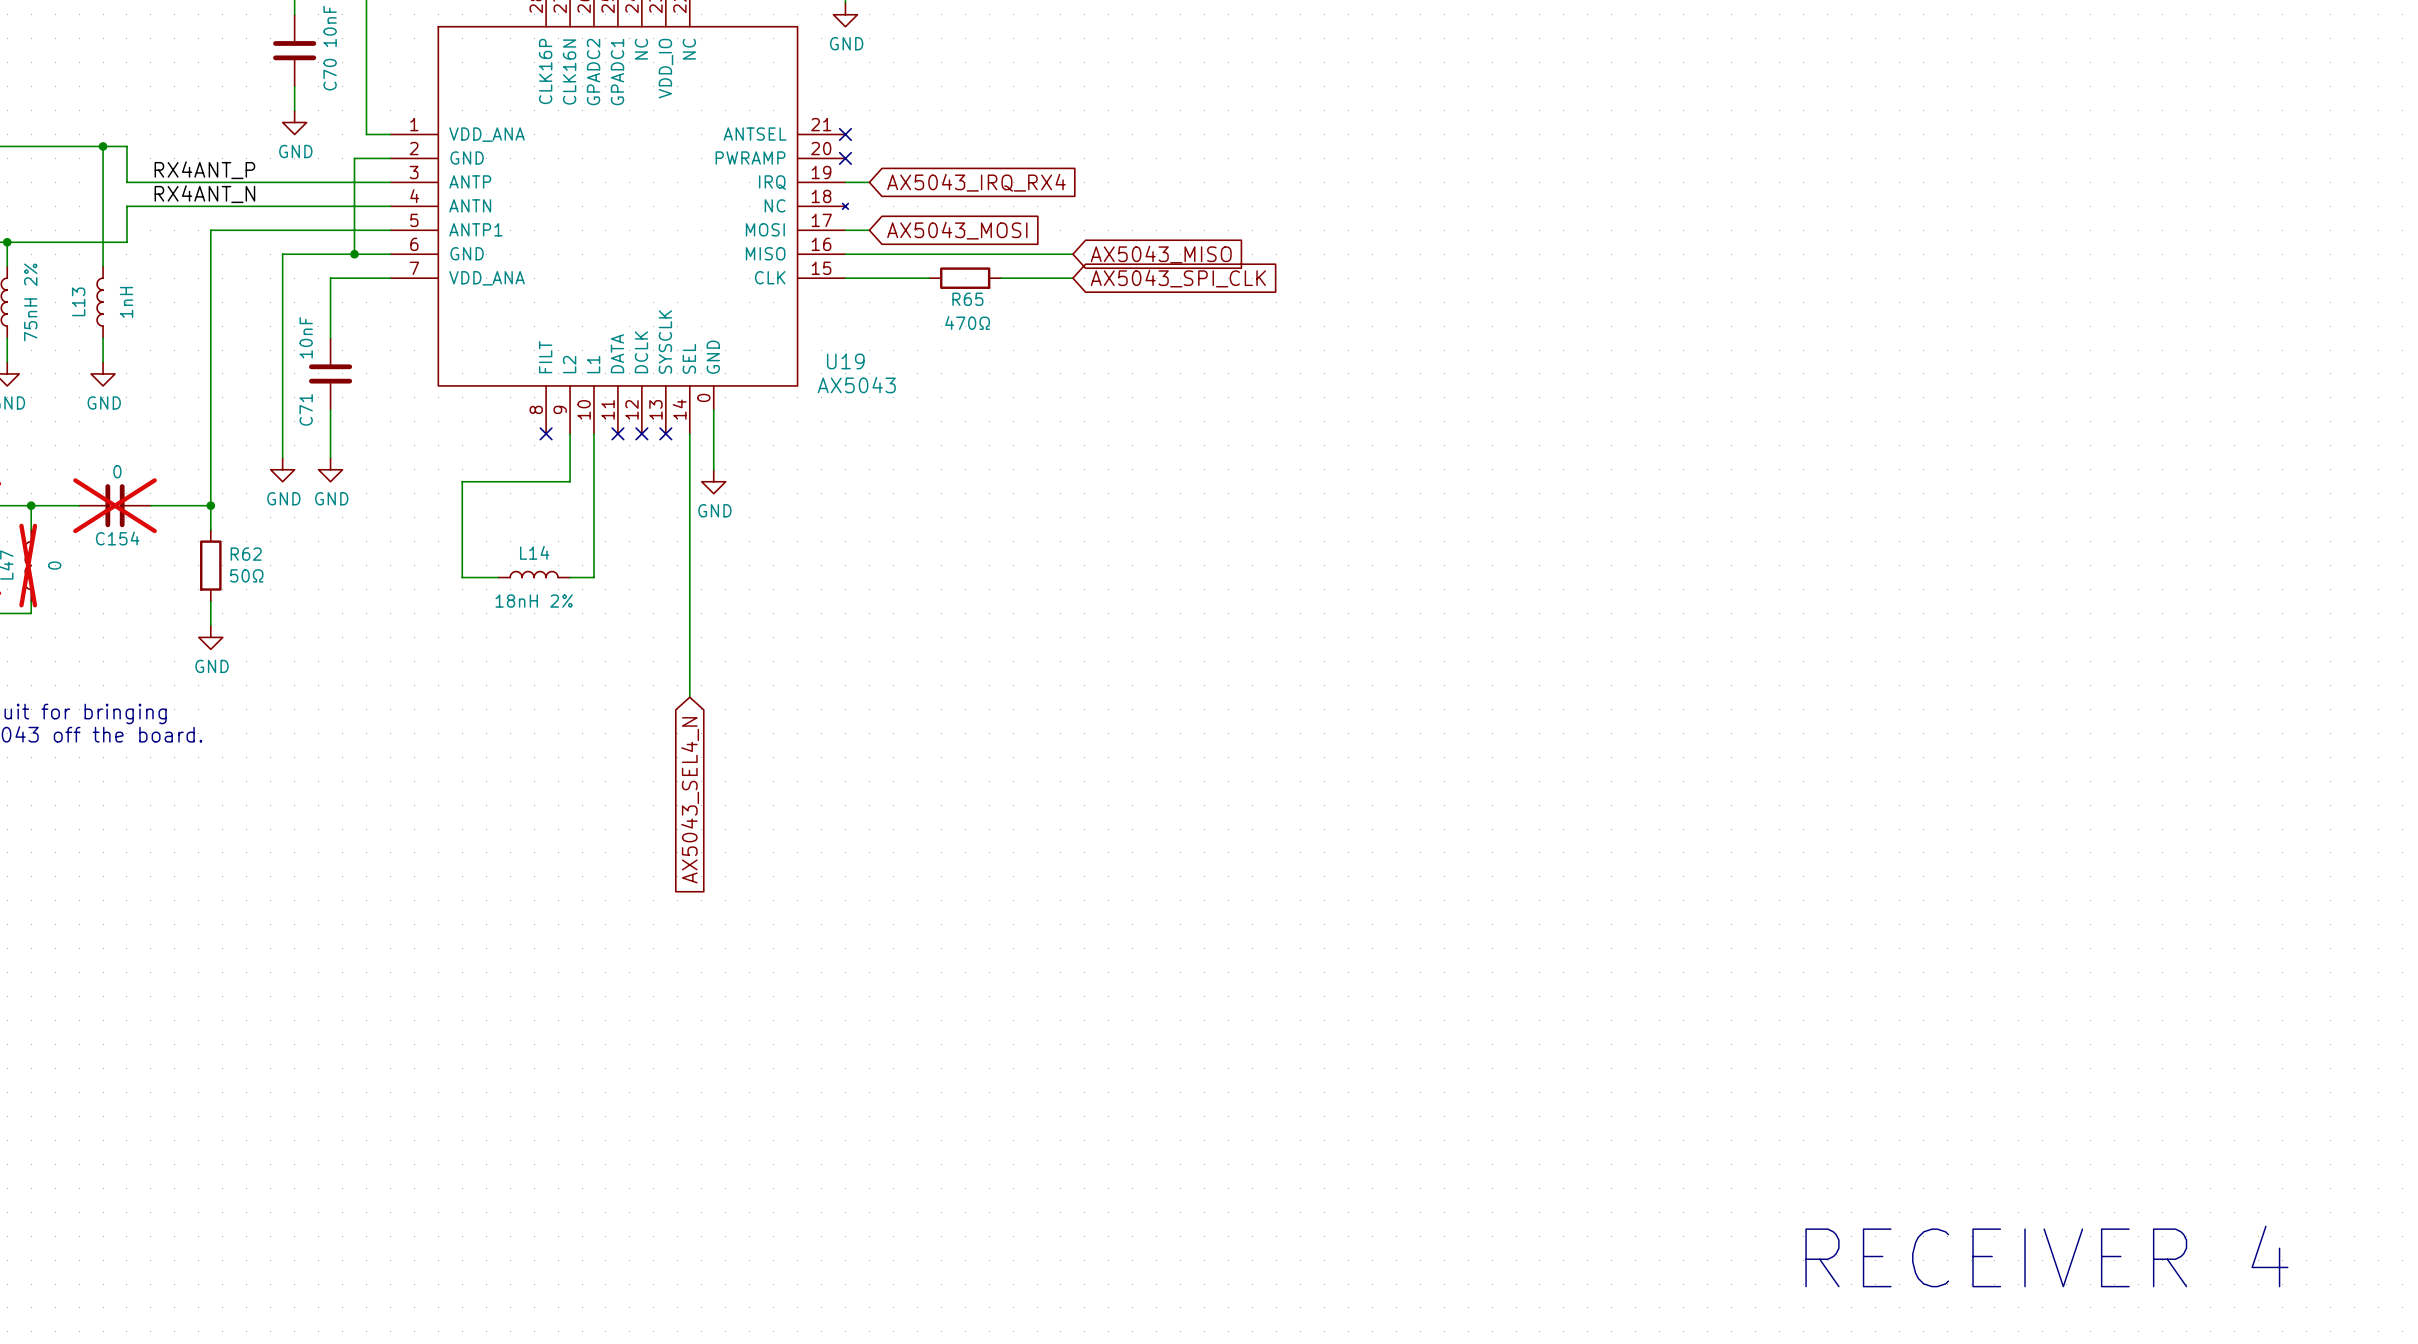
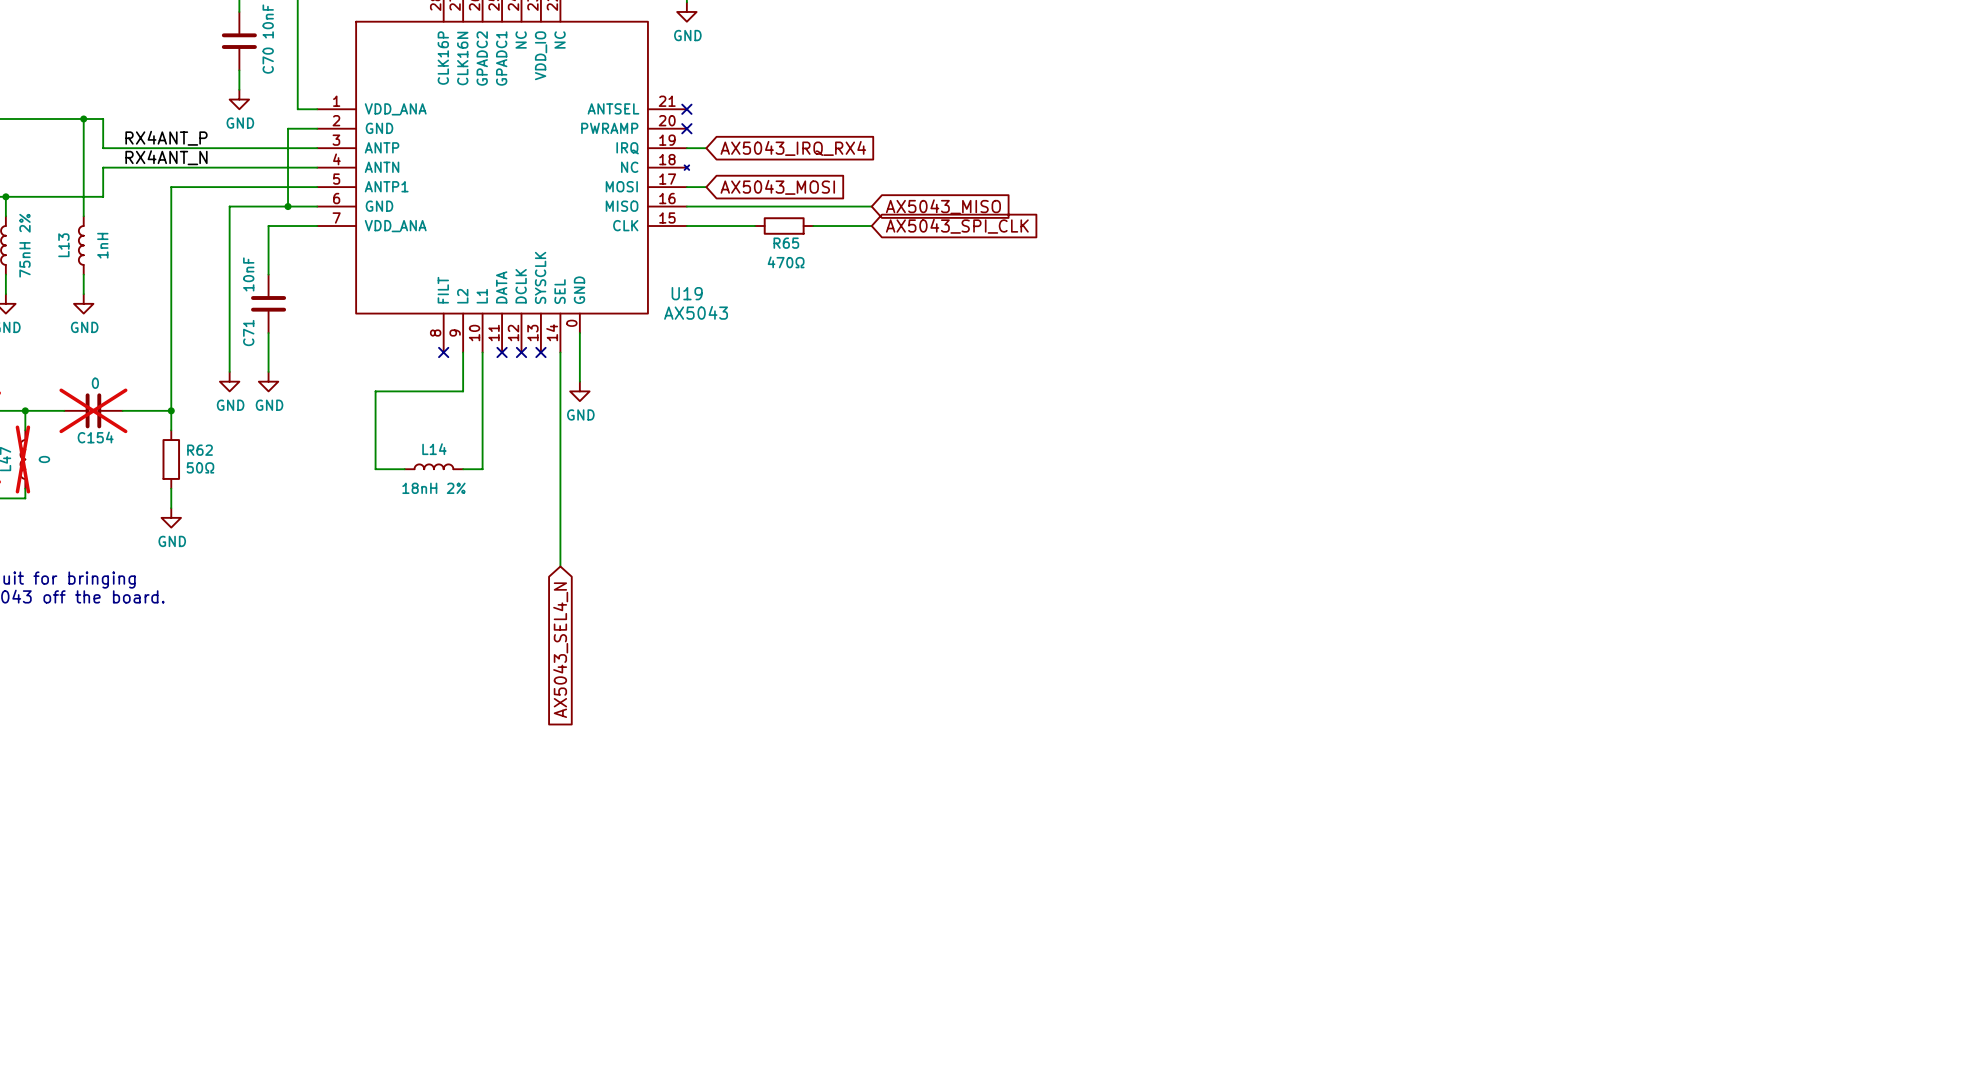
text: RECEIVER 4 (2046, 1256) -> none

